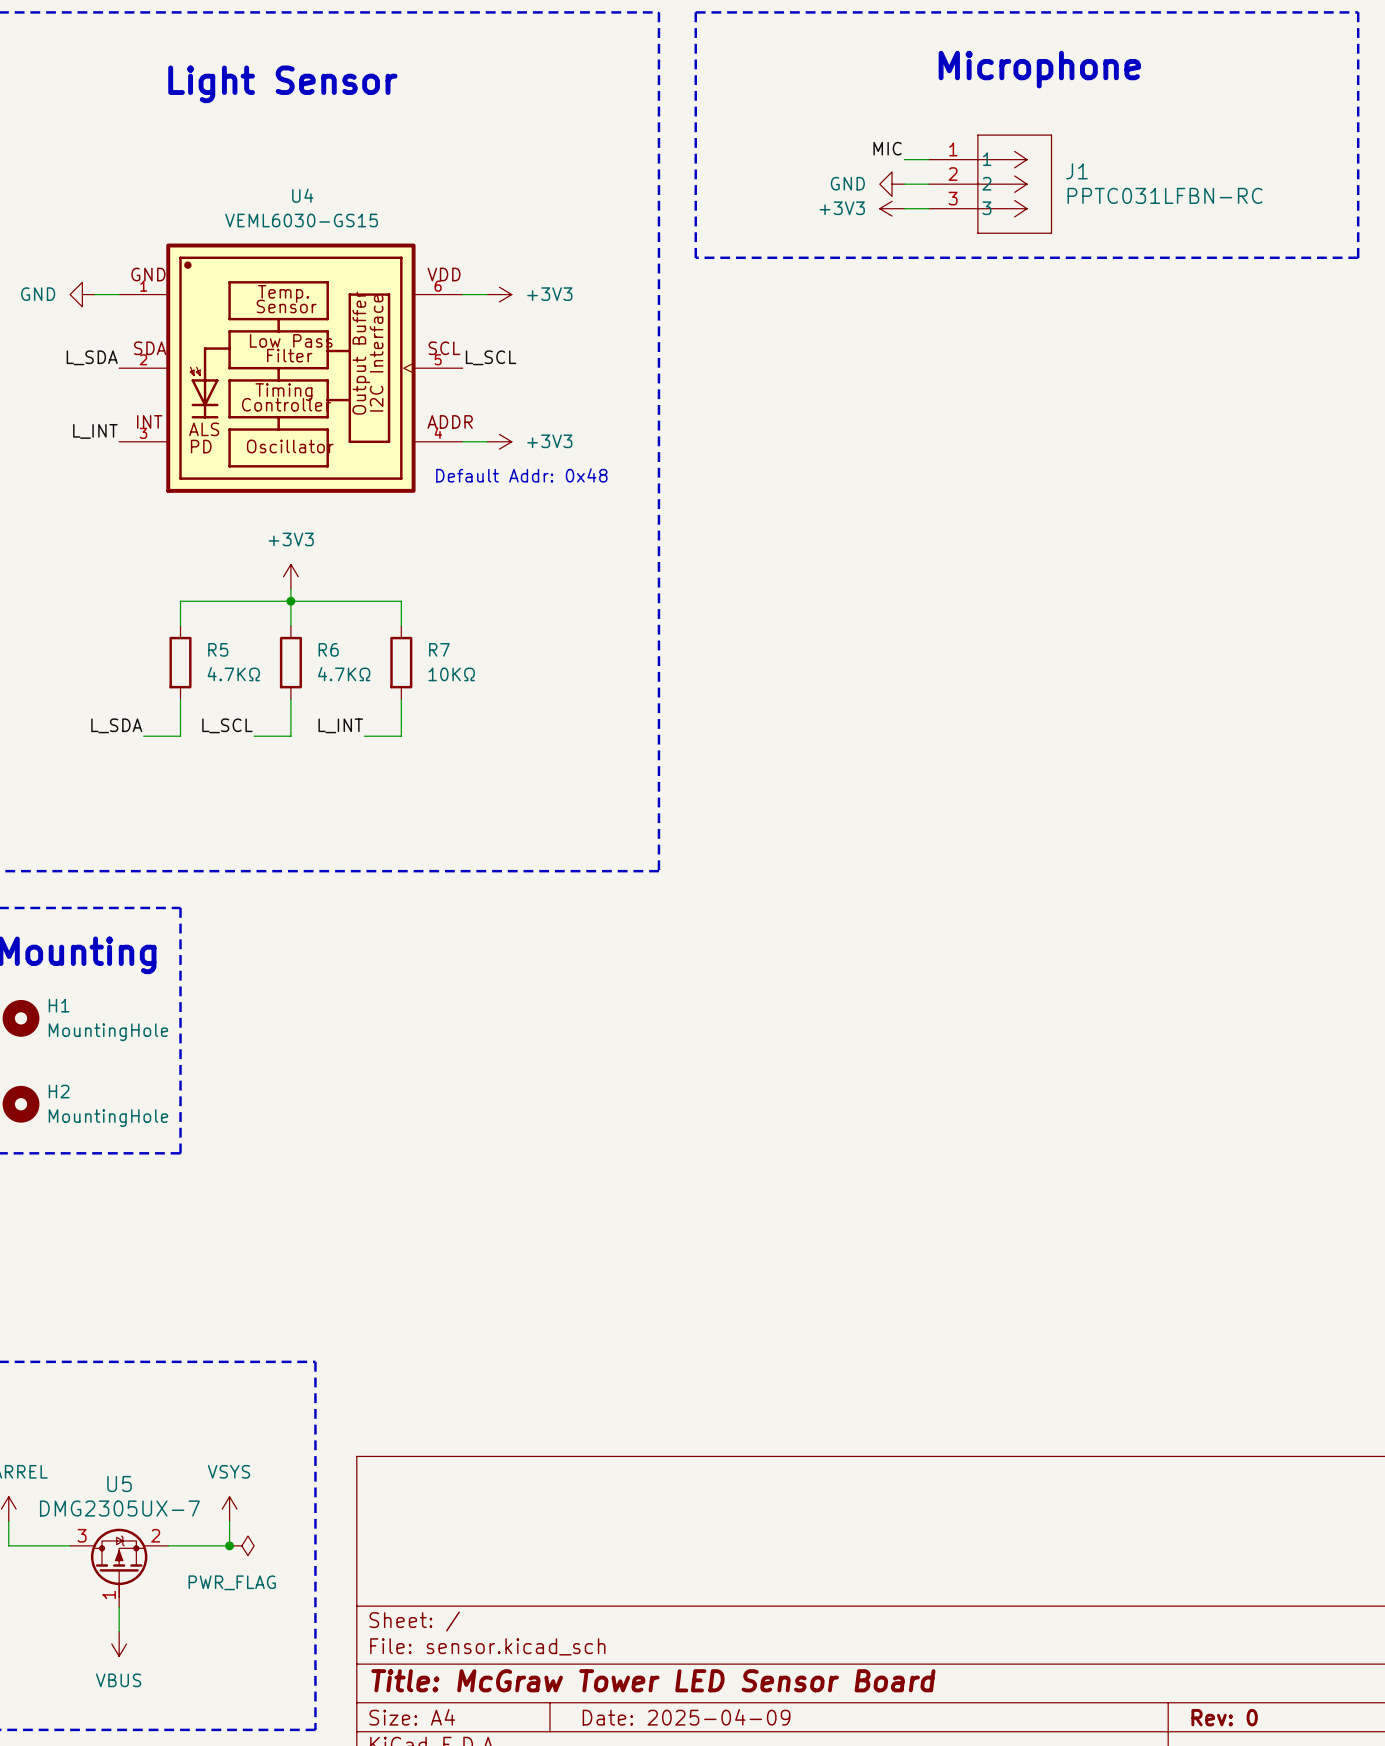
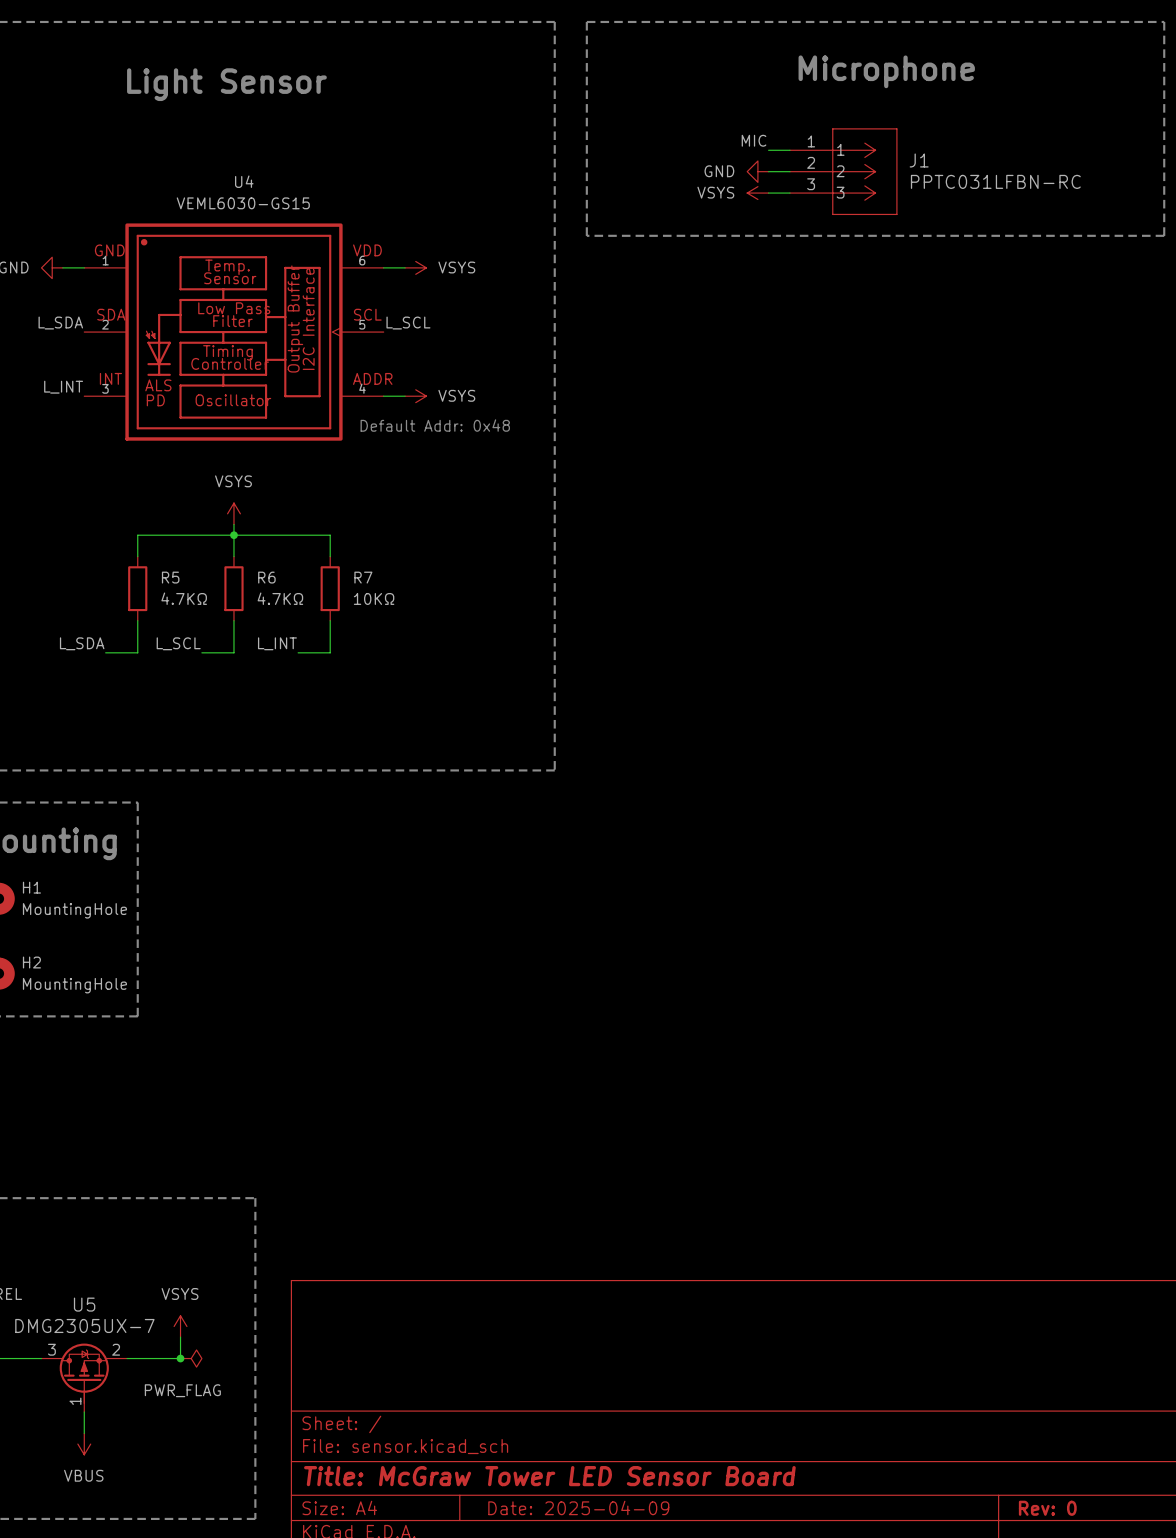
power symbol: +3V3 (892, 208) -> VSYS (757, 193)
power symbol: +3V3 (499, 294) -> VSYS (415, 267)
power symbol: +3V3 (499, 441) -> VSYS (415, 396)
power symbol: +3V3 (290, 576) -> VSYS (233, 513)

